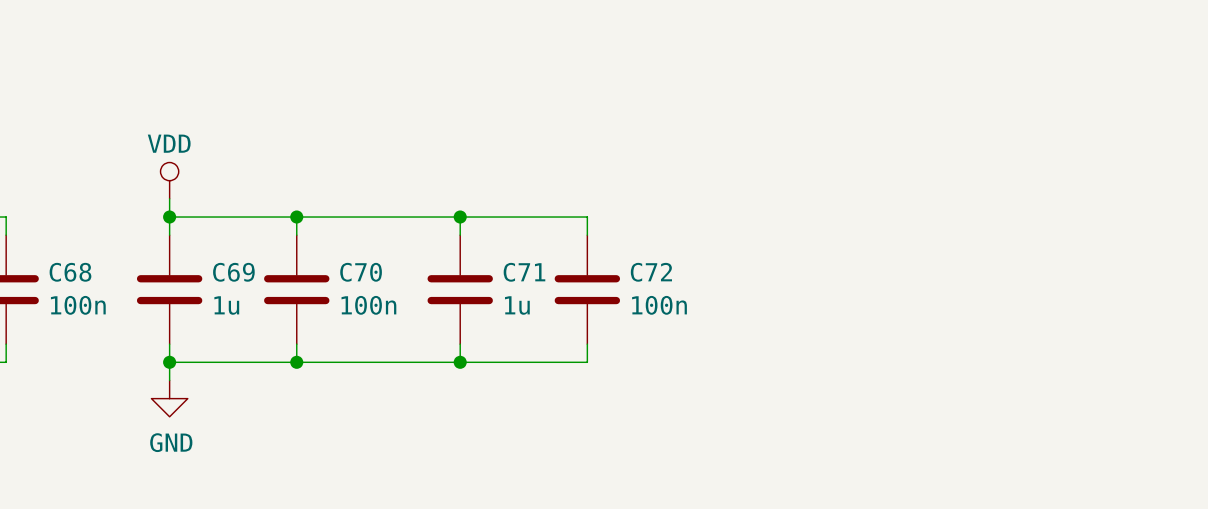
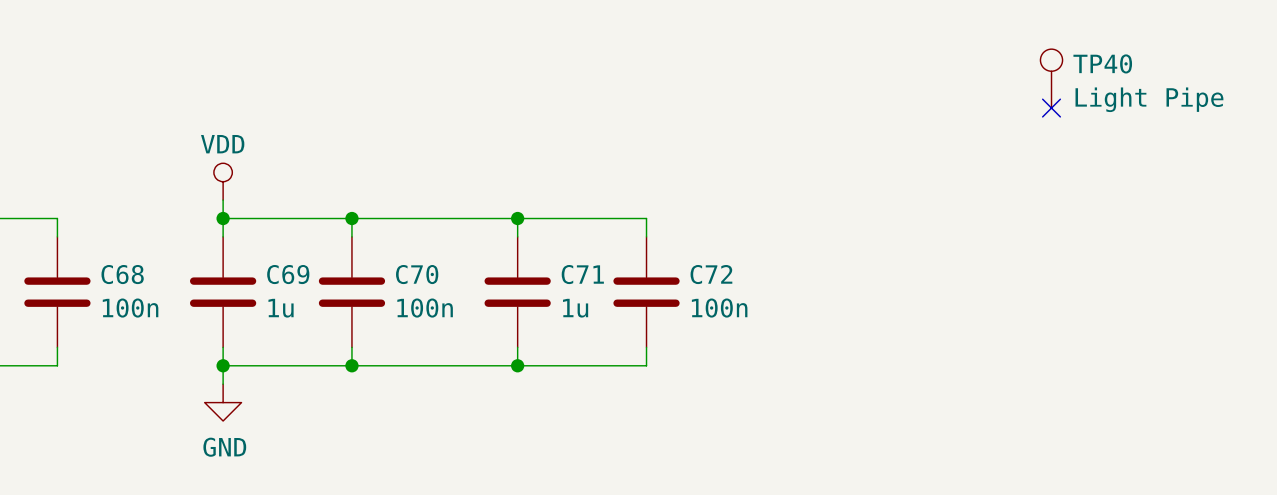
TP40: none -> Light Pipe (1051, 78)
no-connect mark: none -> (1051, 108)

